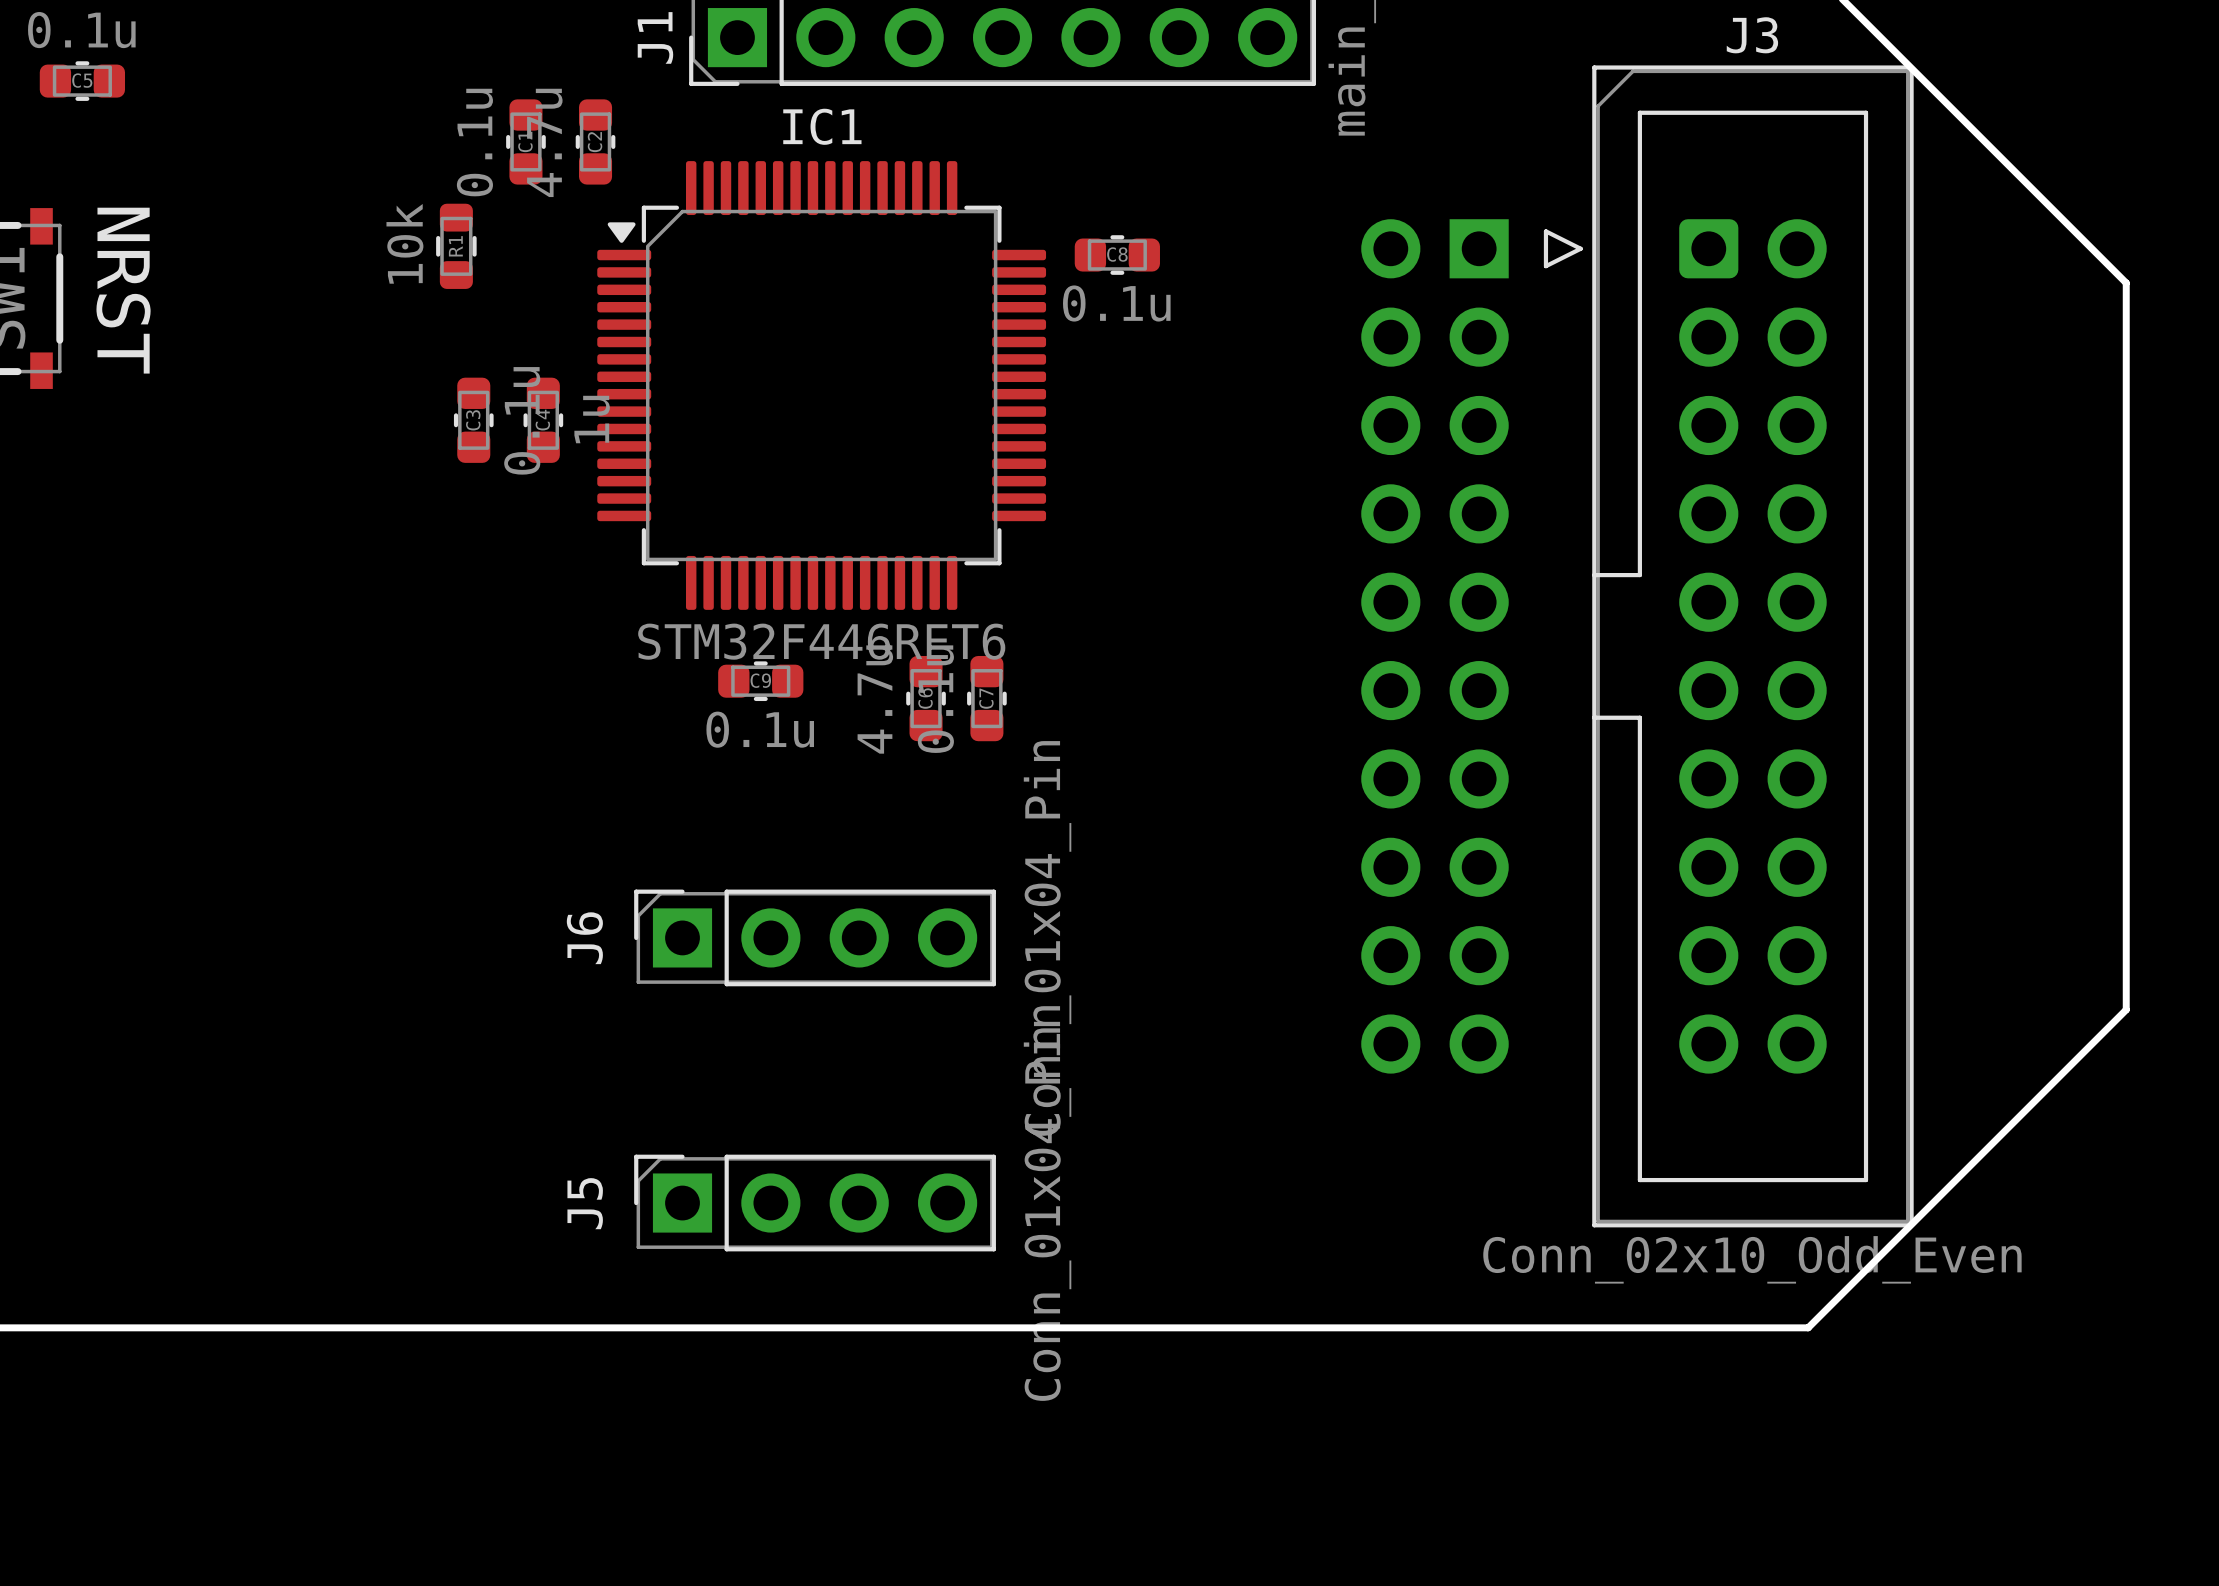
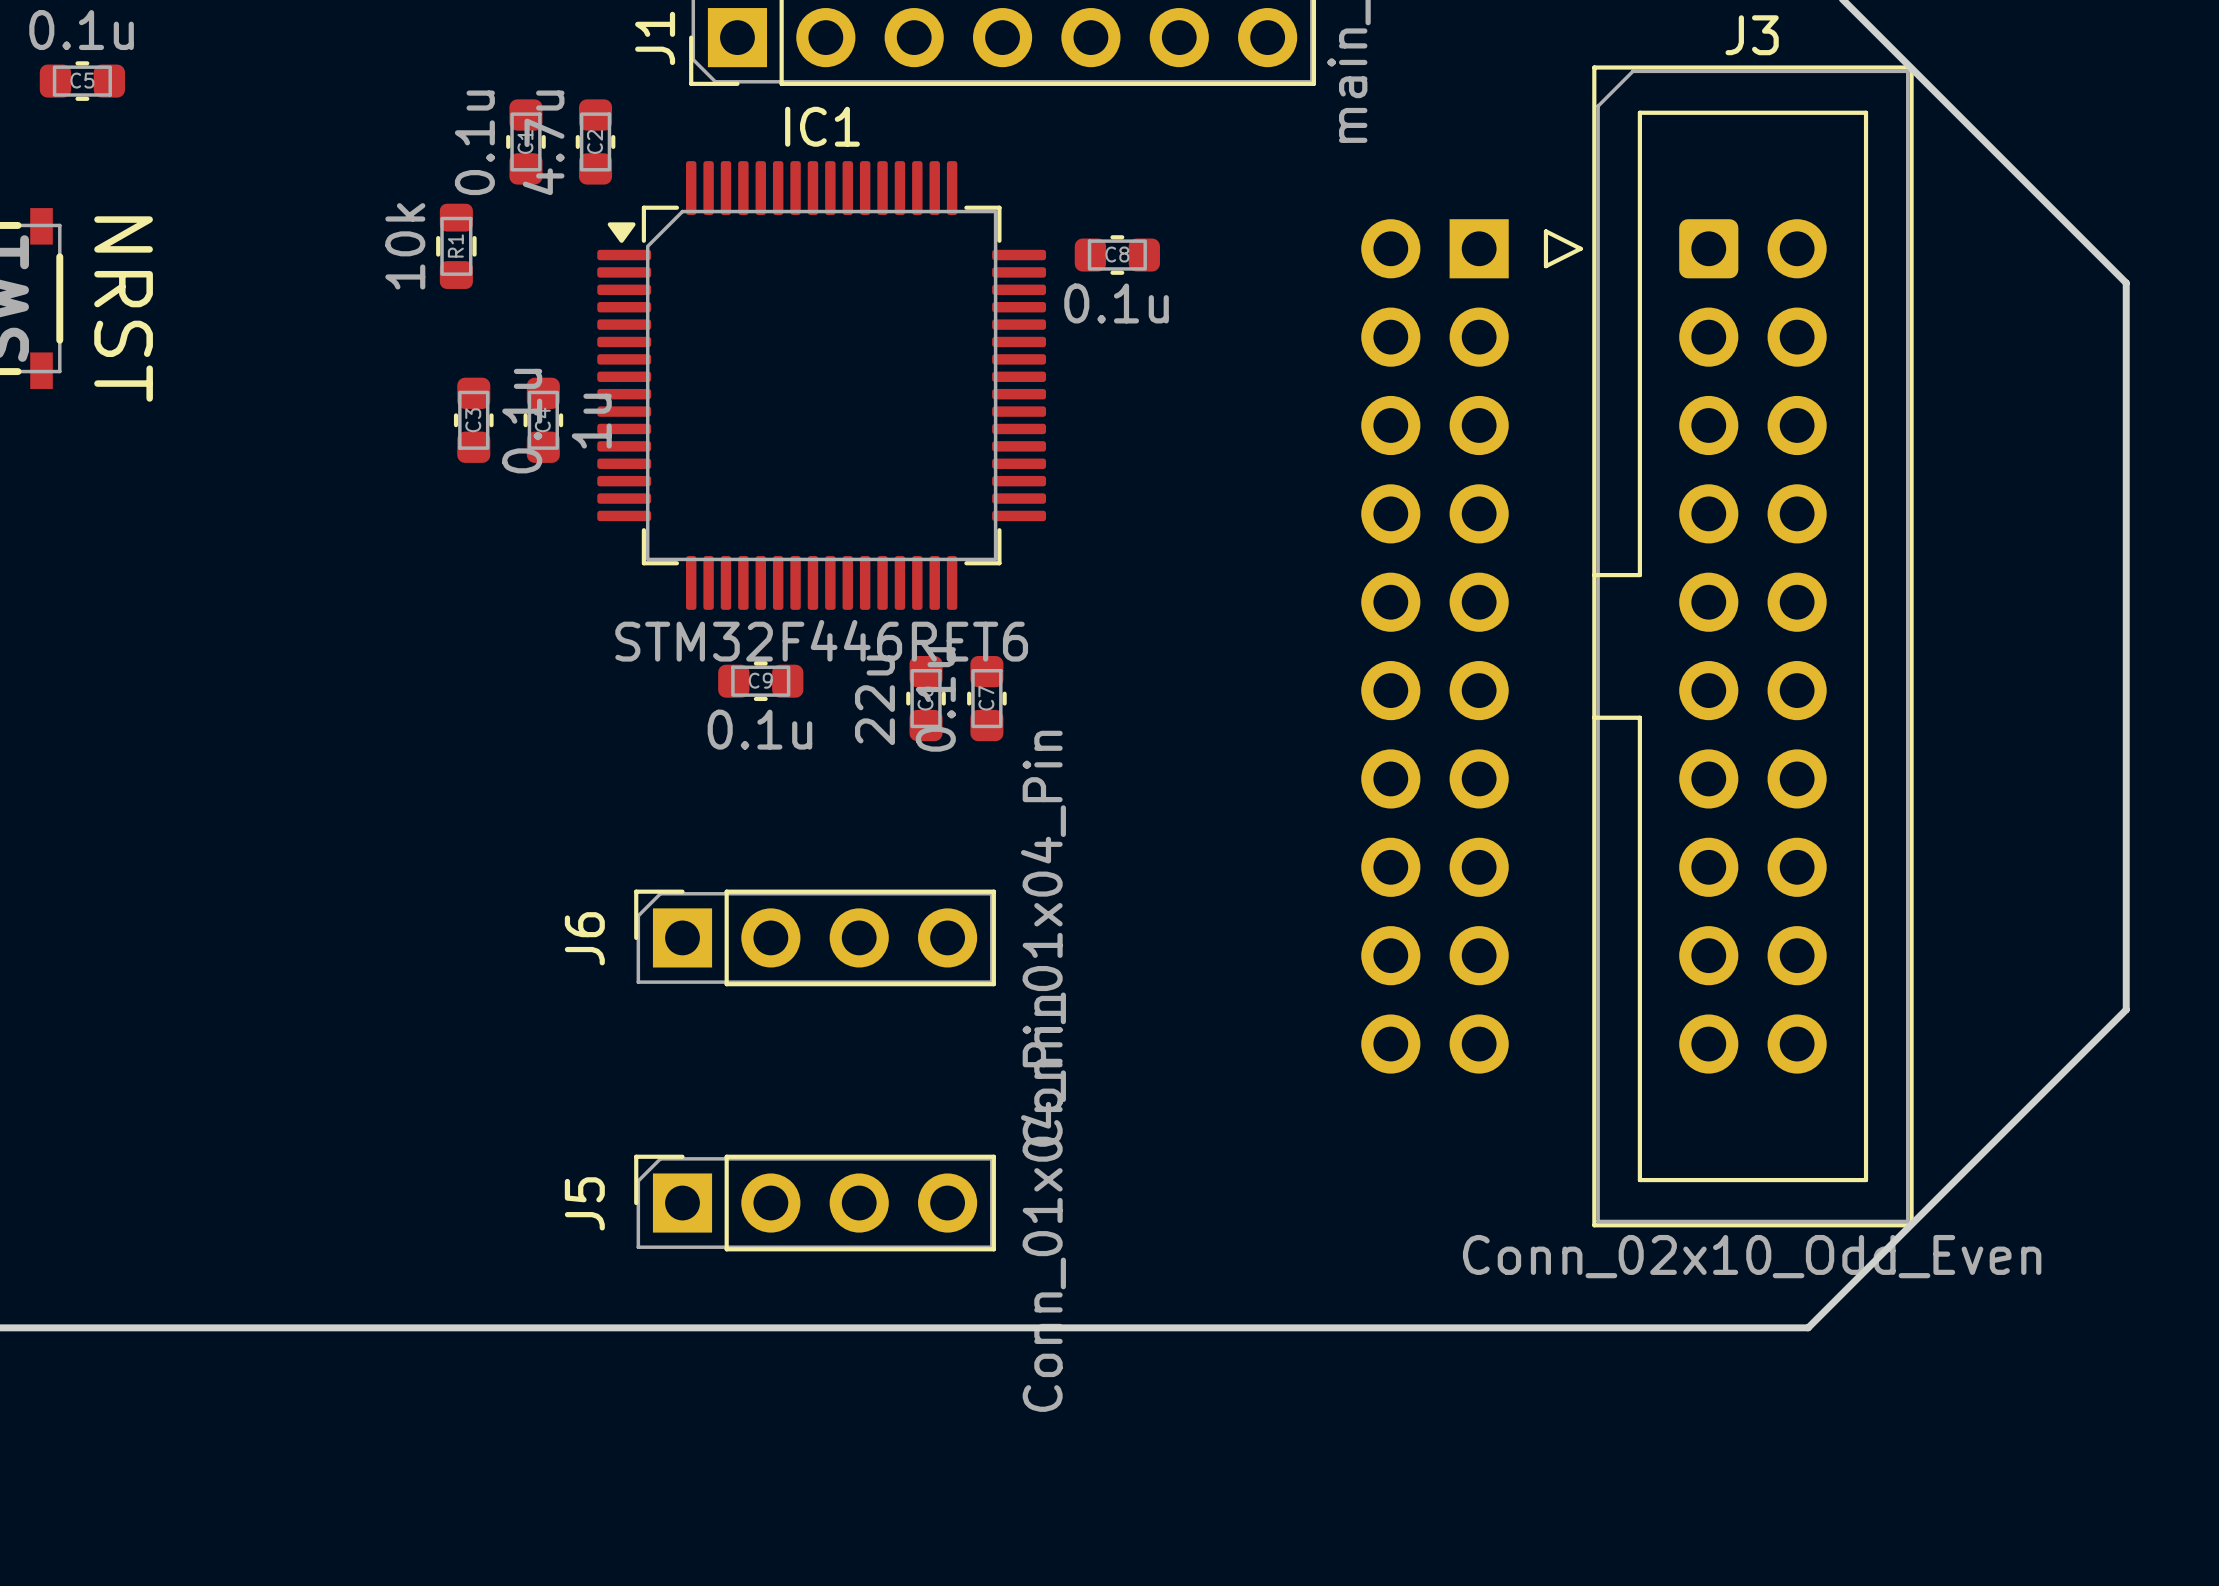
C6 value: 4.7u (875, 699) -> 22u (874, 700)

